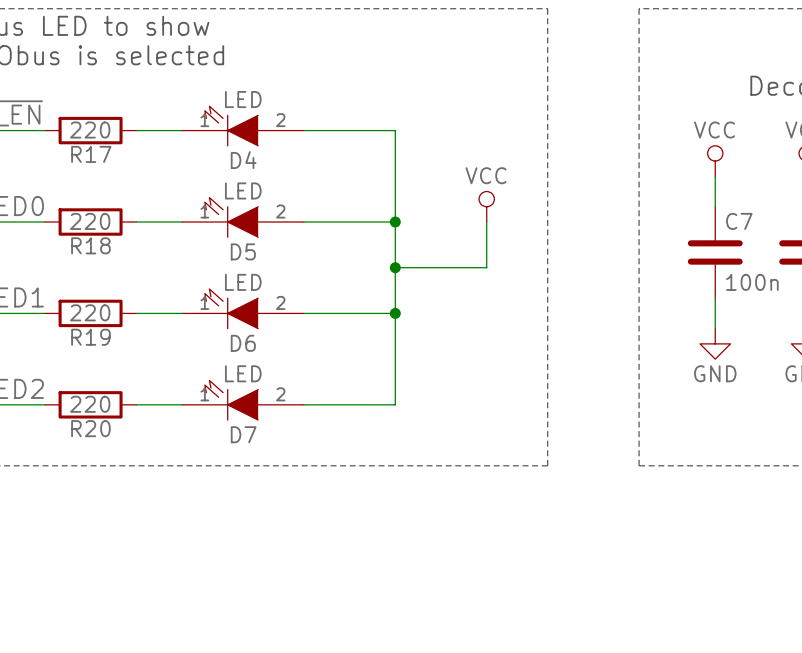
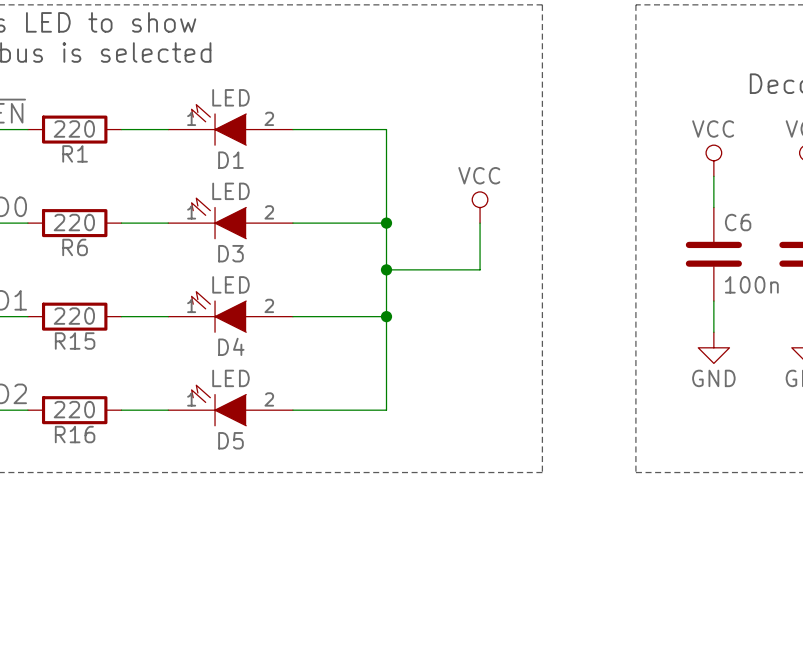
R17 name: R17 (91, 154) -> R1 (75, 153)
D4 name: D4 (243, 160) -> D1 (230, 160)
C7 name: C7 (739, 221) -> C6 (738, 222)
R18 name: R18 (90, 245) -> R6 (75, 247)
D5 name: D5 (243, 251) -> D3 (230, 253)
R19 name: R19 (90, 337) -> R15 (75, 341)
D6 name: D6 (243, 343) -> D4 (231, 346)
R20 name: R20 (90, 428) -> R16 (75, 434)
D7 name: D7 (243, 434) -> D5 (230, 440)

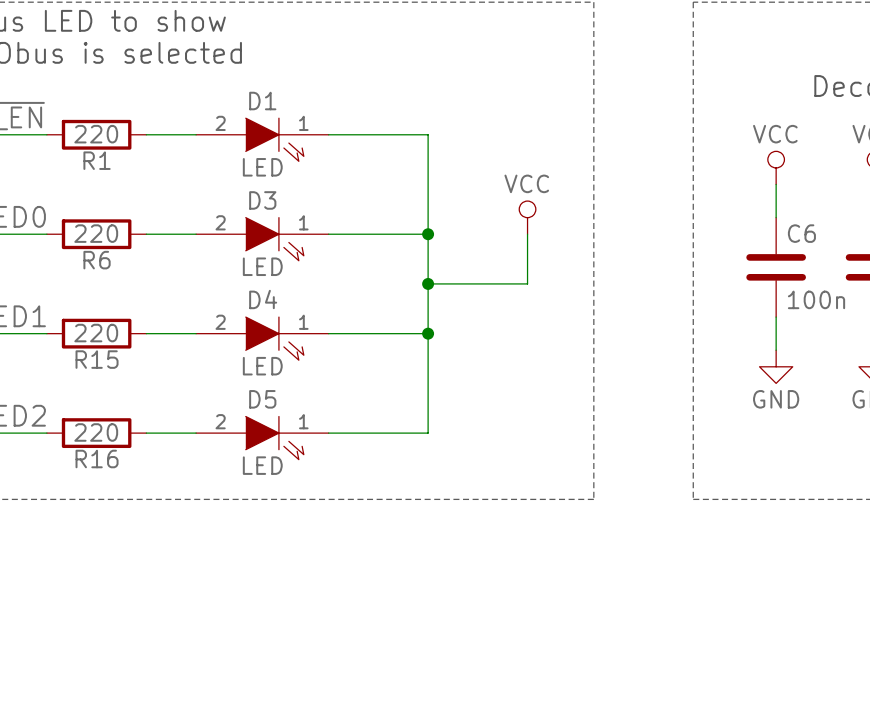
D1 rotation: 0° (218, 124) -> 180° (274, 139)
D3 rotation: 0° (218, 218) -> 180° (274, 239)
D4 rotation: 0° (218, 311) -> 180° (274, 338)
D5 rotation: 0° (218, 405) -> 180° (274, 438)

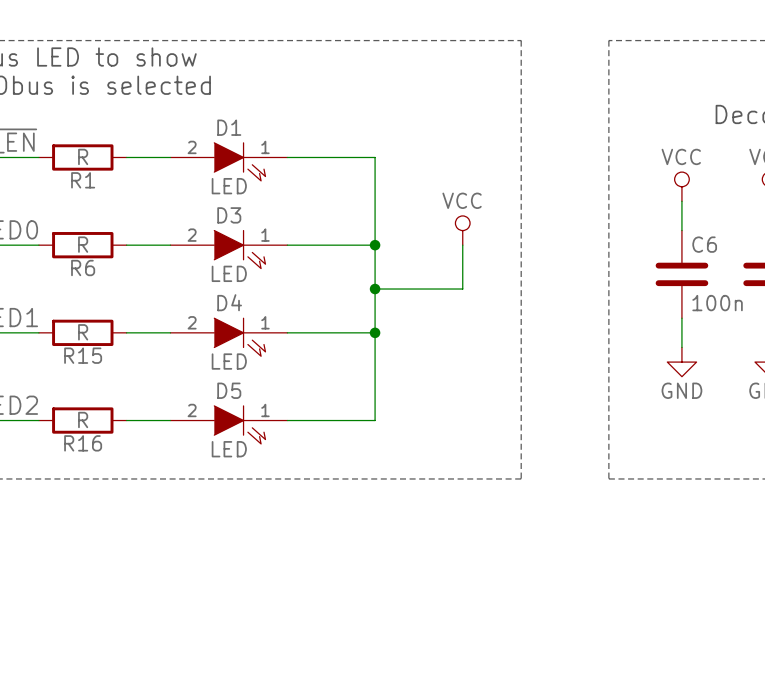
R1 value: 220 (96, 134) -> R (83, 156)
R6 value: 220 (96, 233) -> R (83, 244)
R15 value: 220 (96, 333) -> R (83, 332)
R16 value: 220 (96, 432) -> R (83, 419)

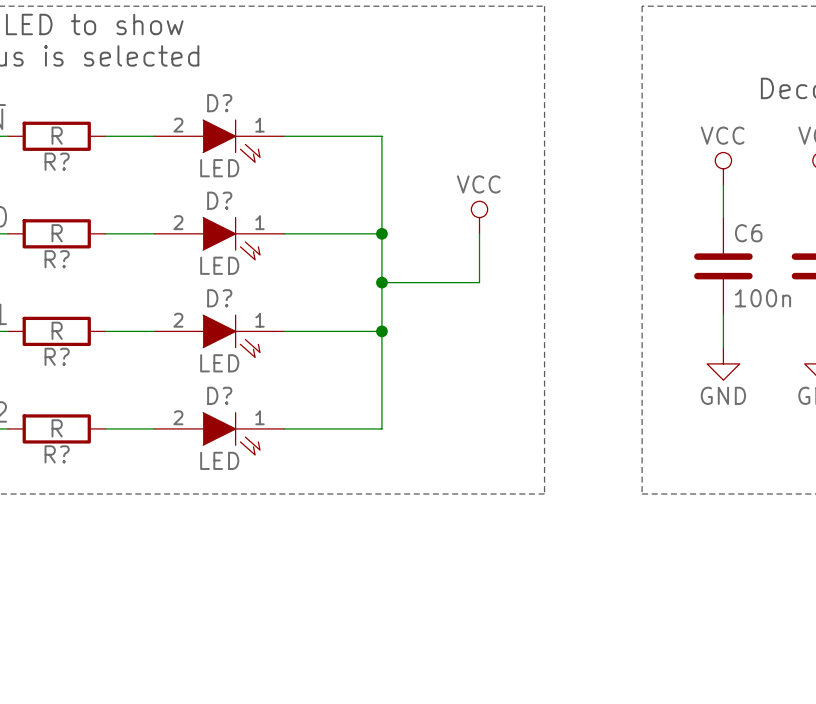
D1 name: D1 (229, 127) -> D? (219, 103)
R1 name: R1 (83, 180) -> R? (57, 161)
D3 name: D3 (229, 215) -> D? (219, 200)
R6 name: R6 (83, 268) -> R? (57, 259)
D4 name: D4 (229, 302) -> D? (219, 298)
R15 name: R15 (83, 355) -> R? (57, 356)
D5 name: D5 (229, 390) -> D? (219, 395)
R16 name: R16 (83, 443) -> R? (57, 454)

